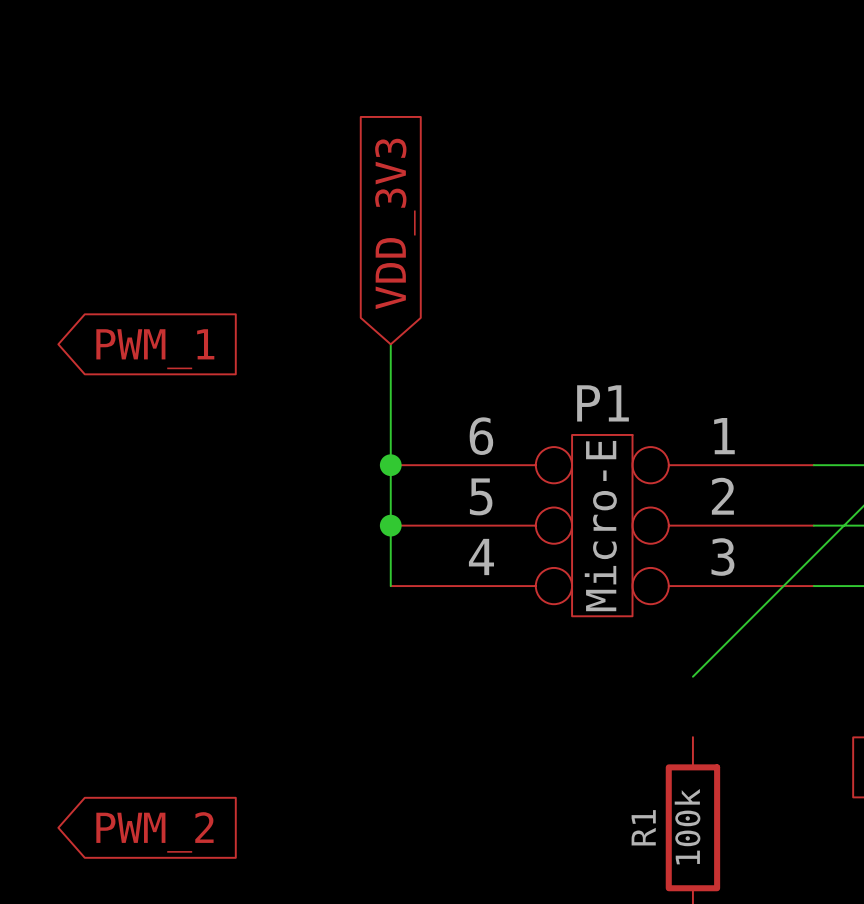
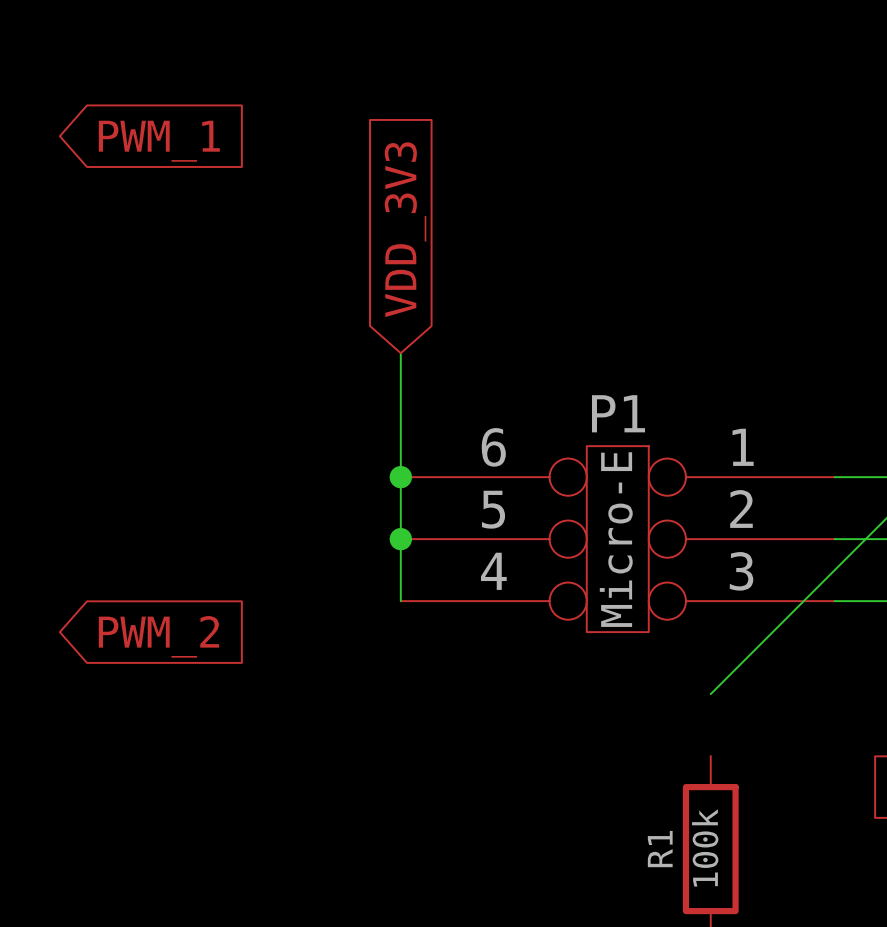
global label position: PWM_1 (155, 349) -> PWM_1 (159, 141)
global label position: PWM_2 (154, 832) -> PWM_2 (158, 636)

